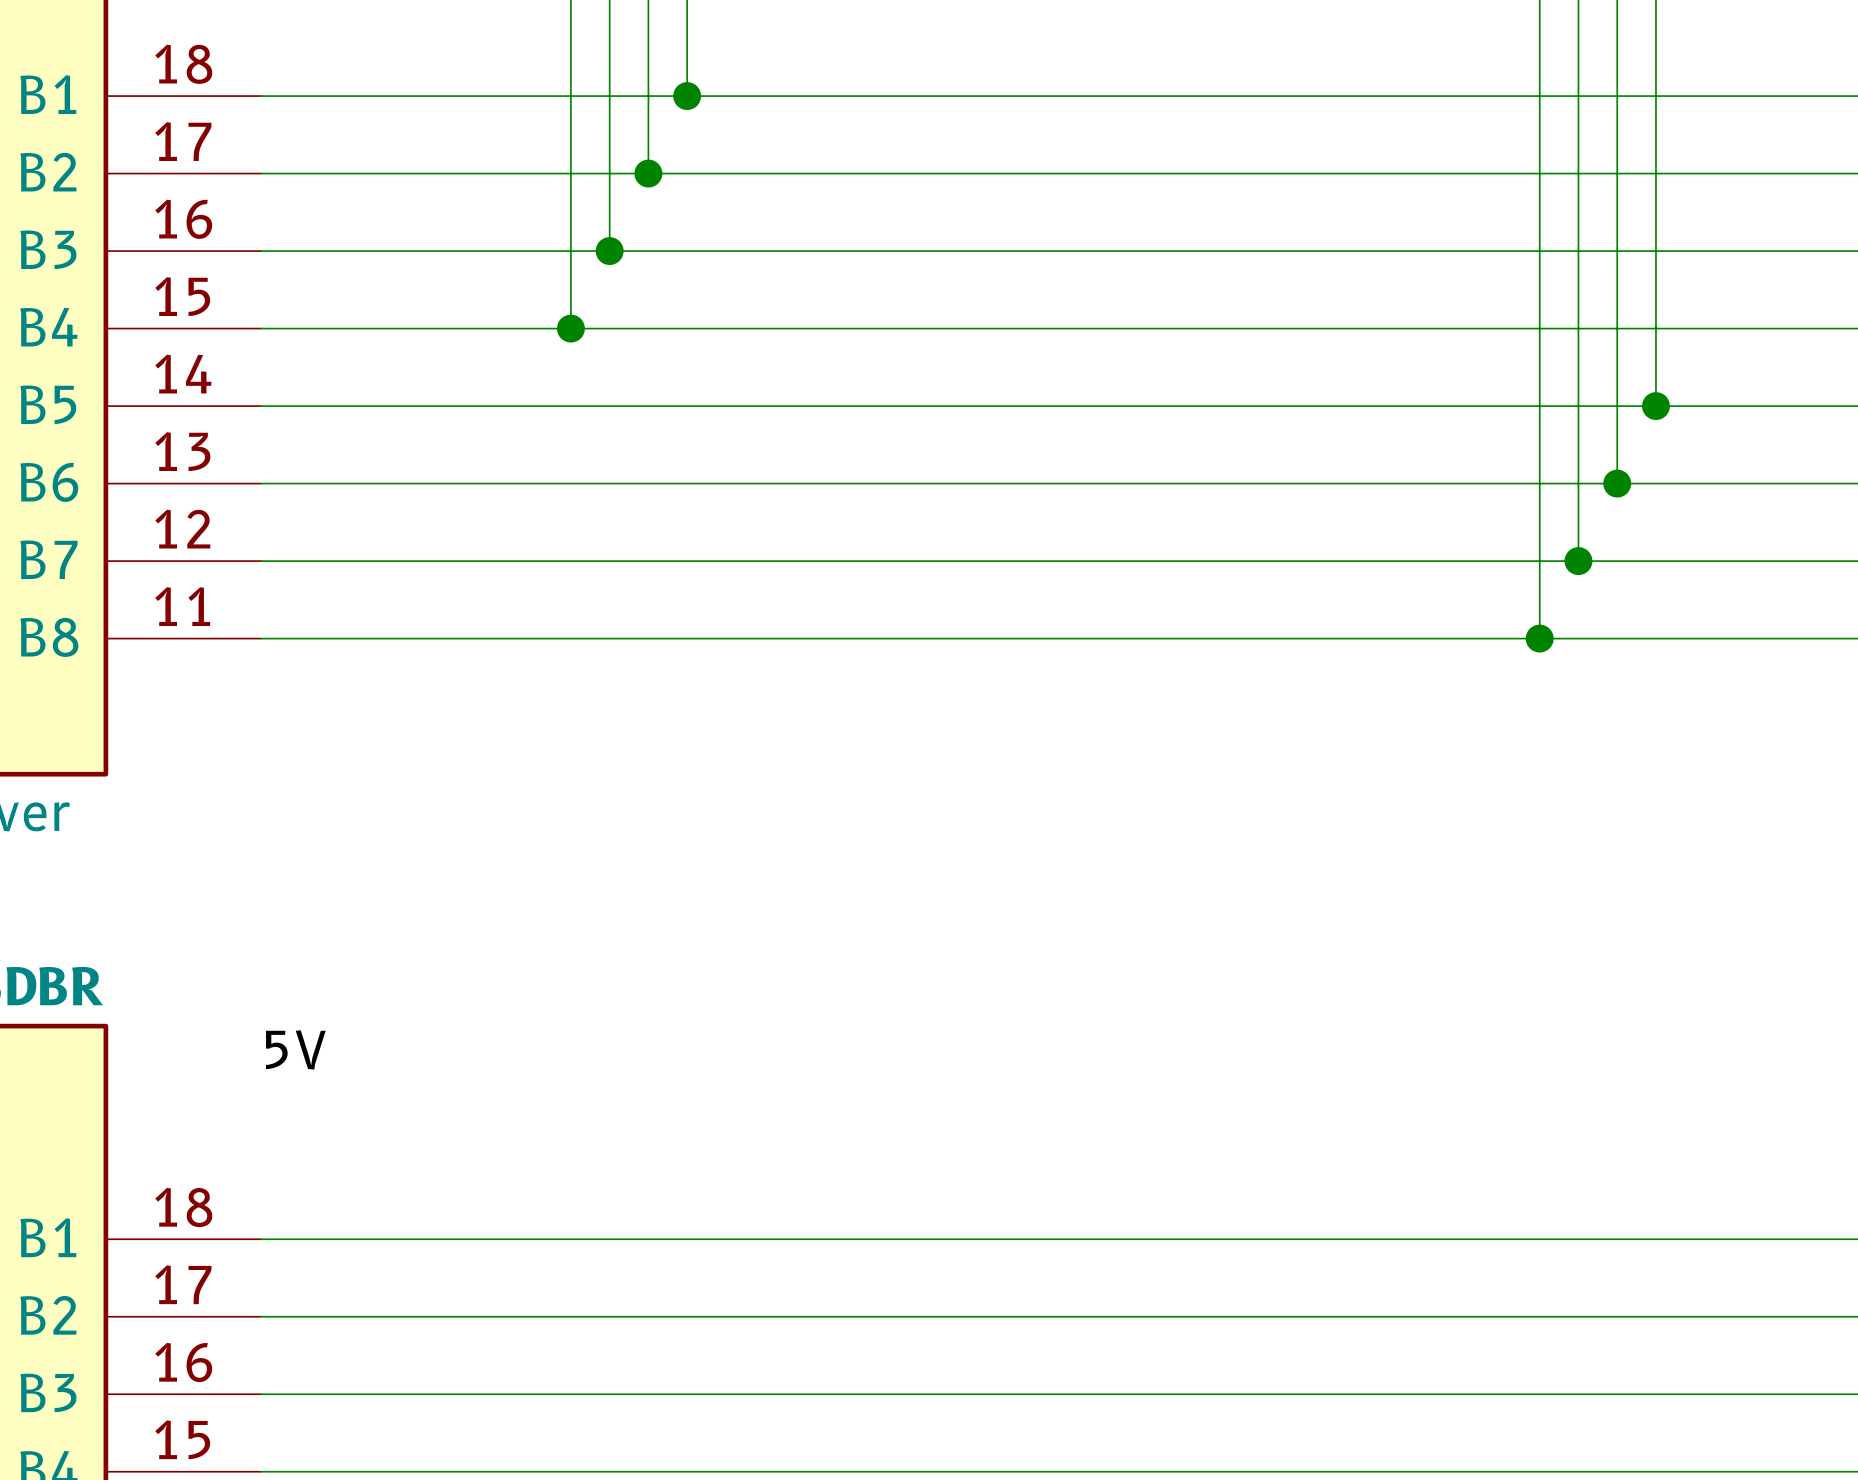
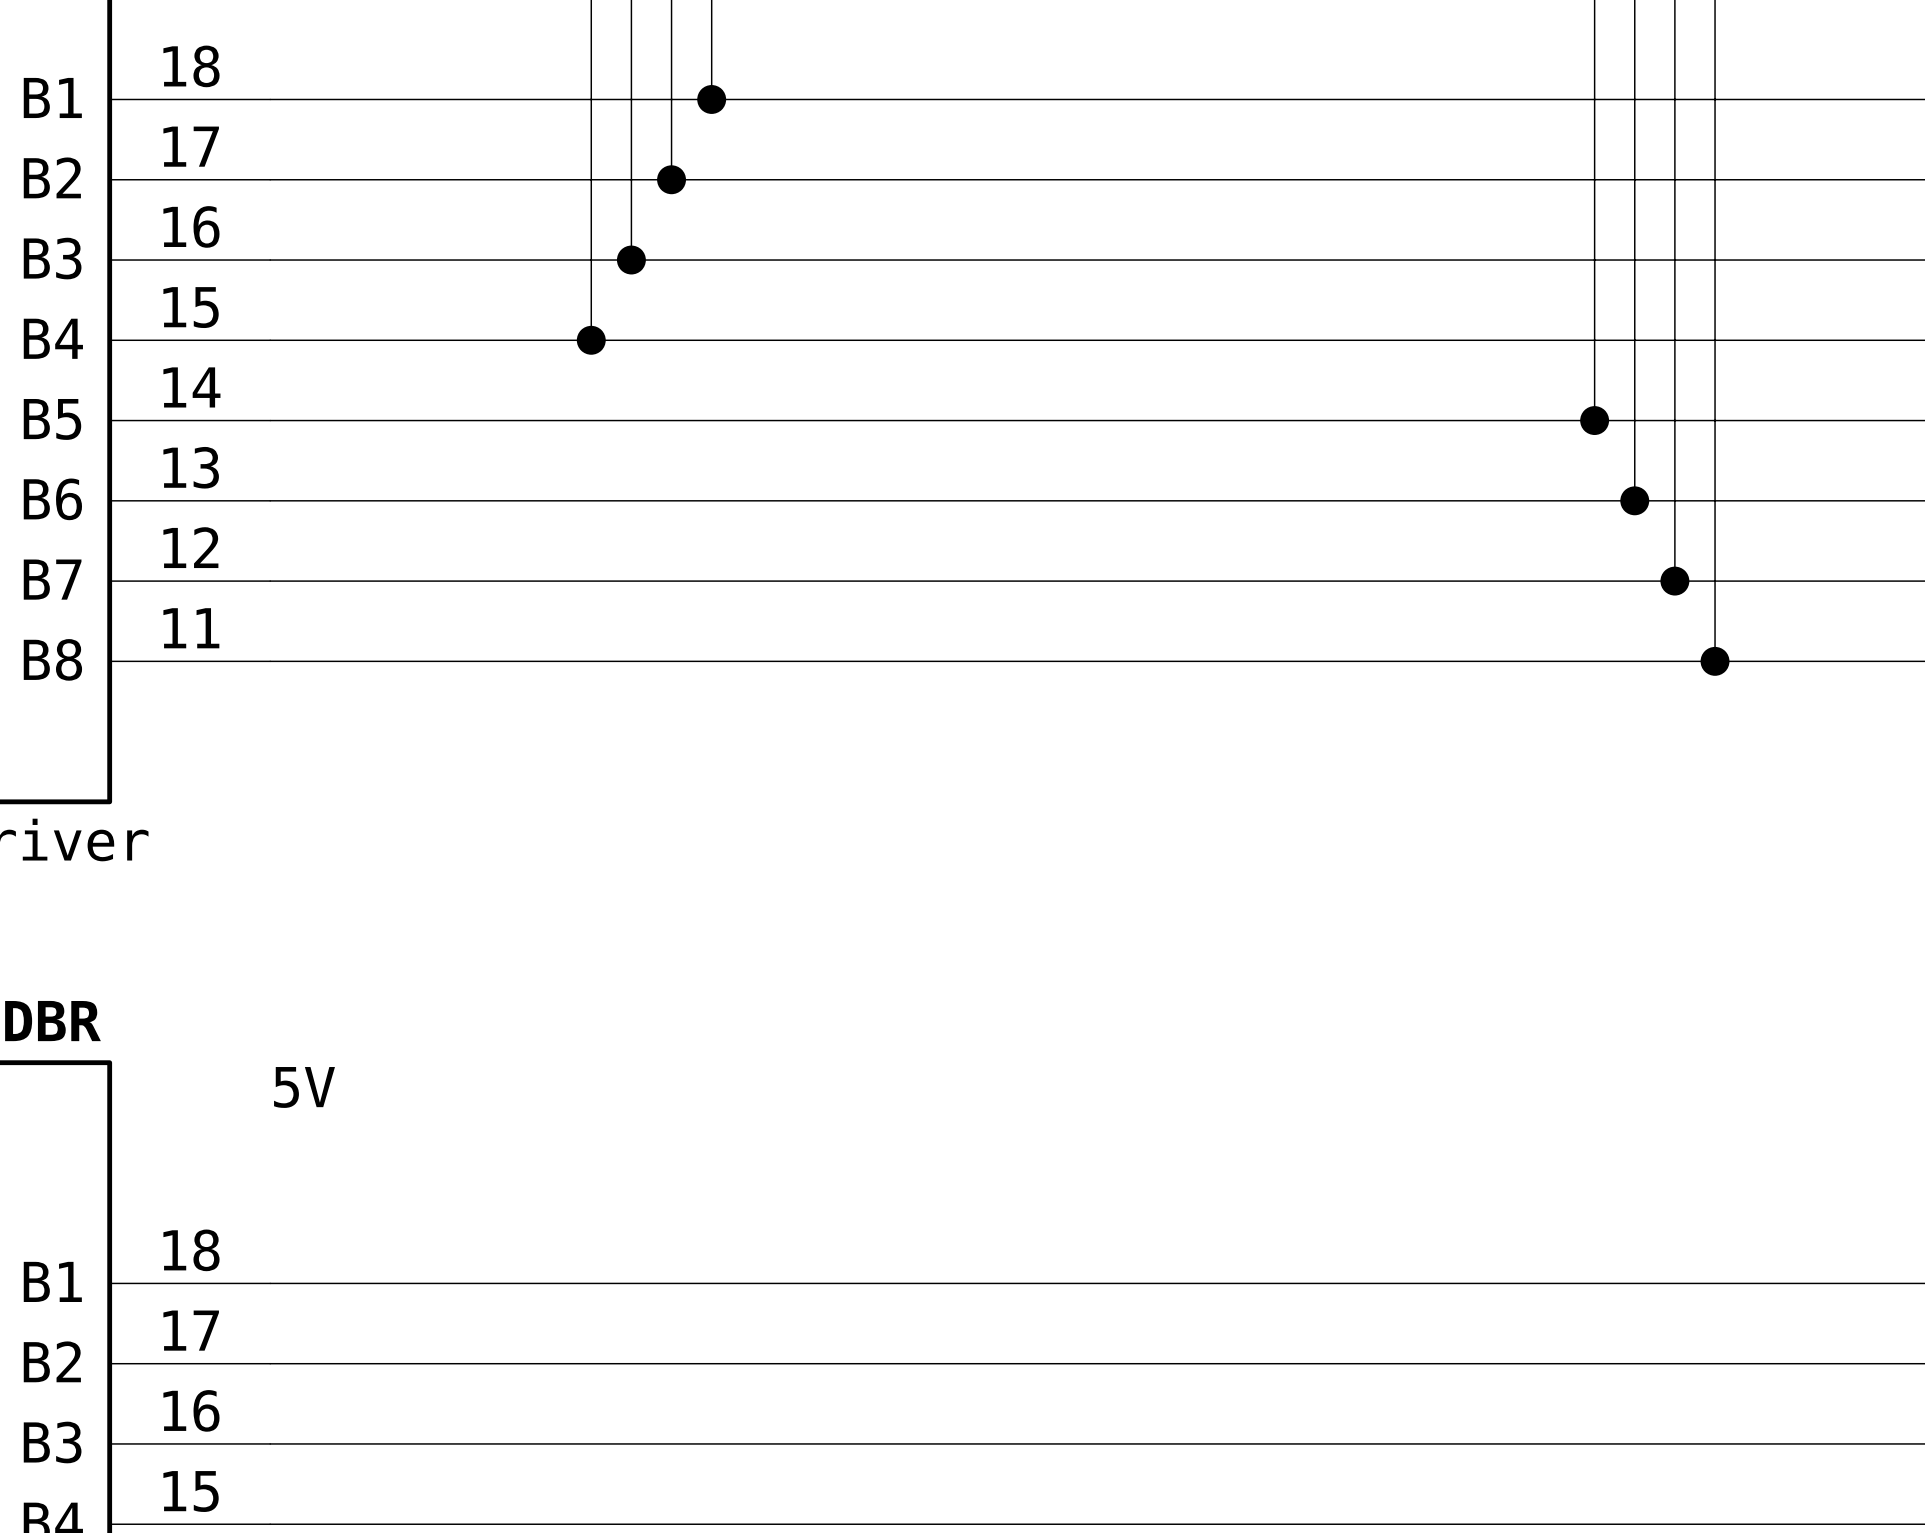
wire: (1539, 406) (1539, 638) -> (1715, 420) (1715, 661)
junction: none -> (1594, 420)
junction: (1655, 406) -> none
wire: (1578, 483) (1578, 561) -> (1674, 500) (1674, 581)
junction: none -> (1634, 500)
junction: (1617, 483) -> none
junction: (1578, 561) -> none
junction: none -> (1674, 581)
junction: (1539, 638) -> none
junction: none -> (1715, 661)

